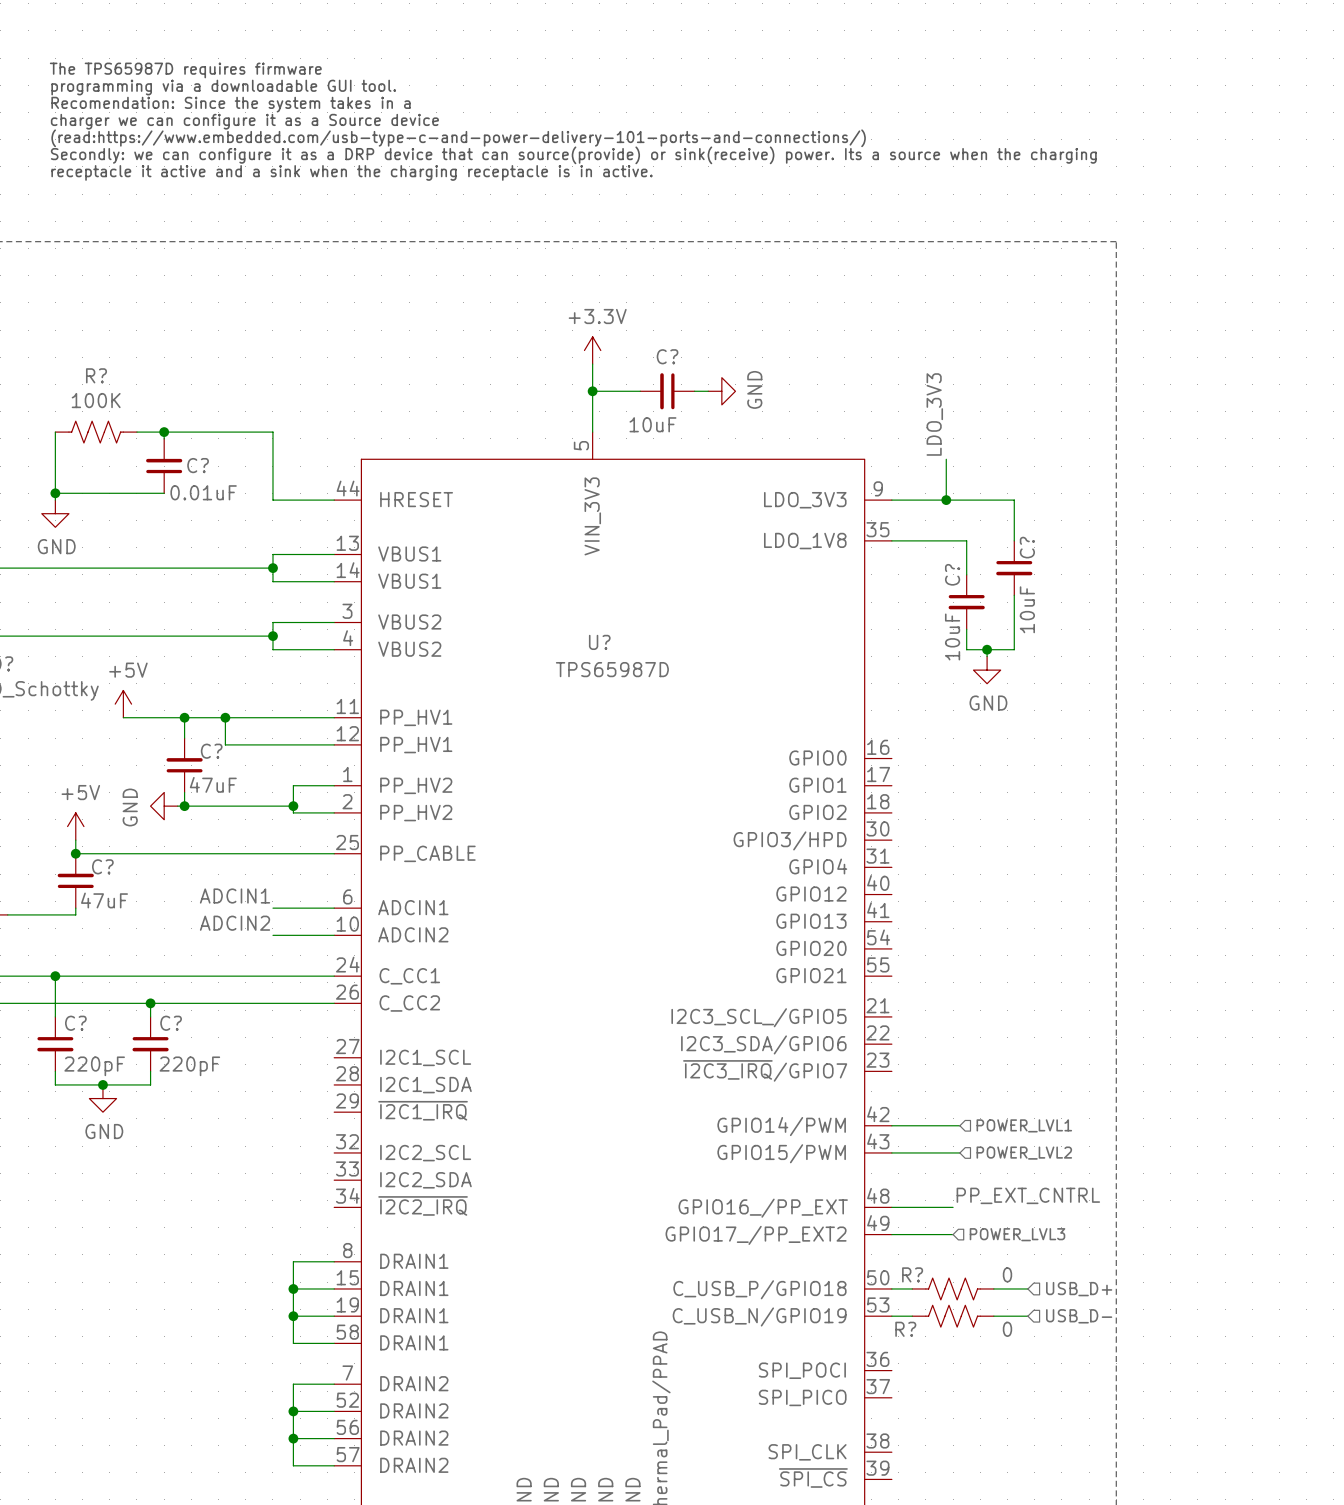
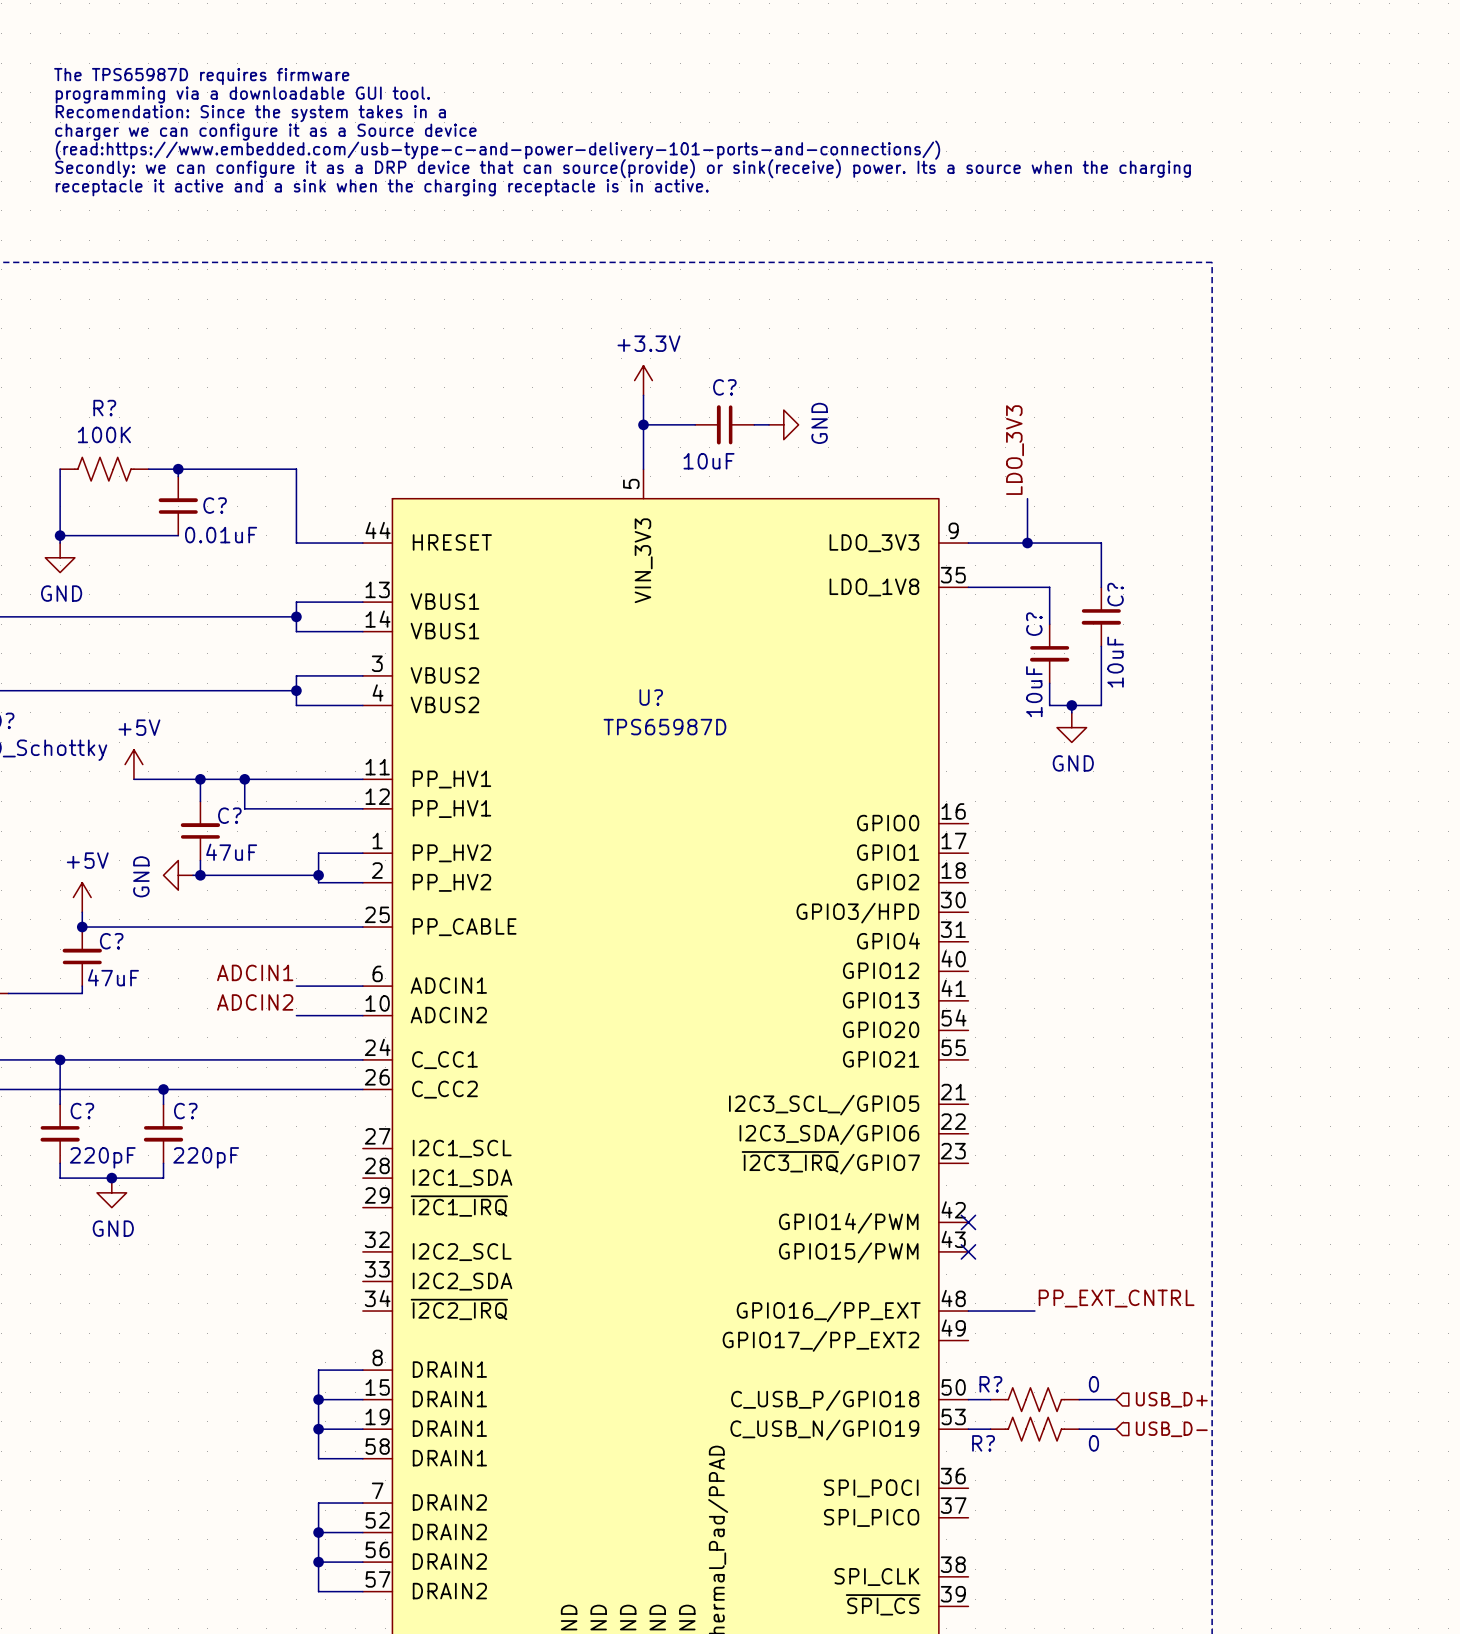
wire: (891, 1125) (959, 1125) -> none
no-connect mark: none -> (968, 1222)
hierarchical label: POWER_LVL1 (1024, 1125) -> none
wire: (891, 1152) (959, 1152) -> none
no-connect mark: none -> (968, 1251)
hierarchical label: POWER_LVL2 (1024, 1153) -> none
wire: (891, 1234) (953, 1234) -> none
hierarchical label: POWER_LVL3 (1017, 1234) -> none

